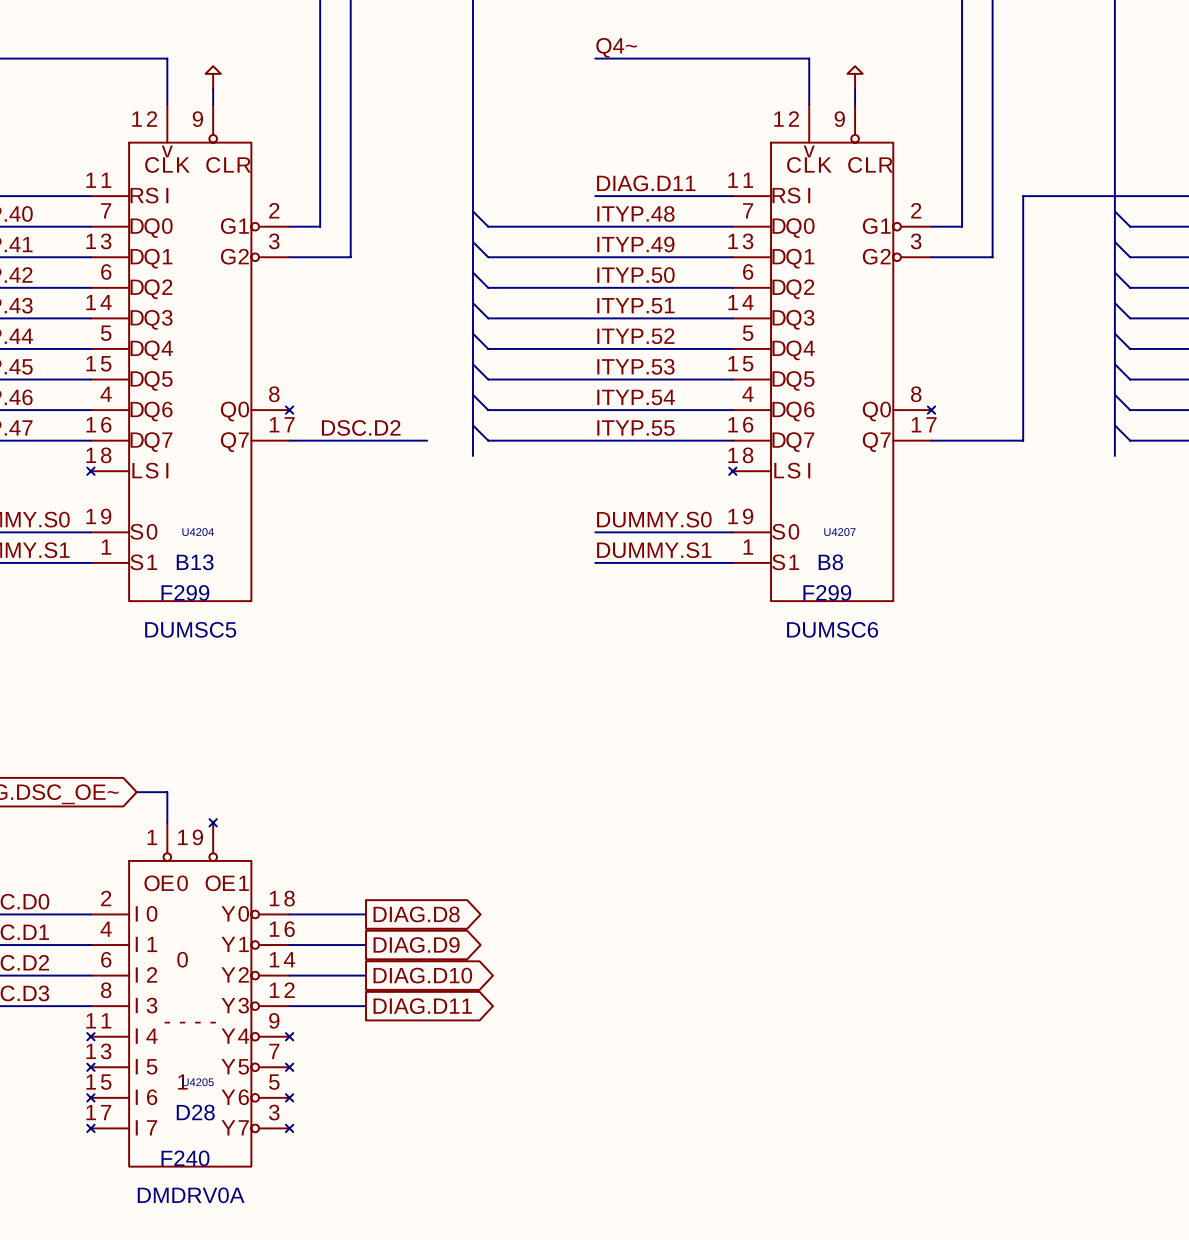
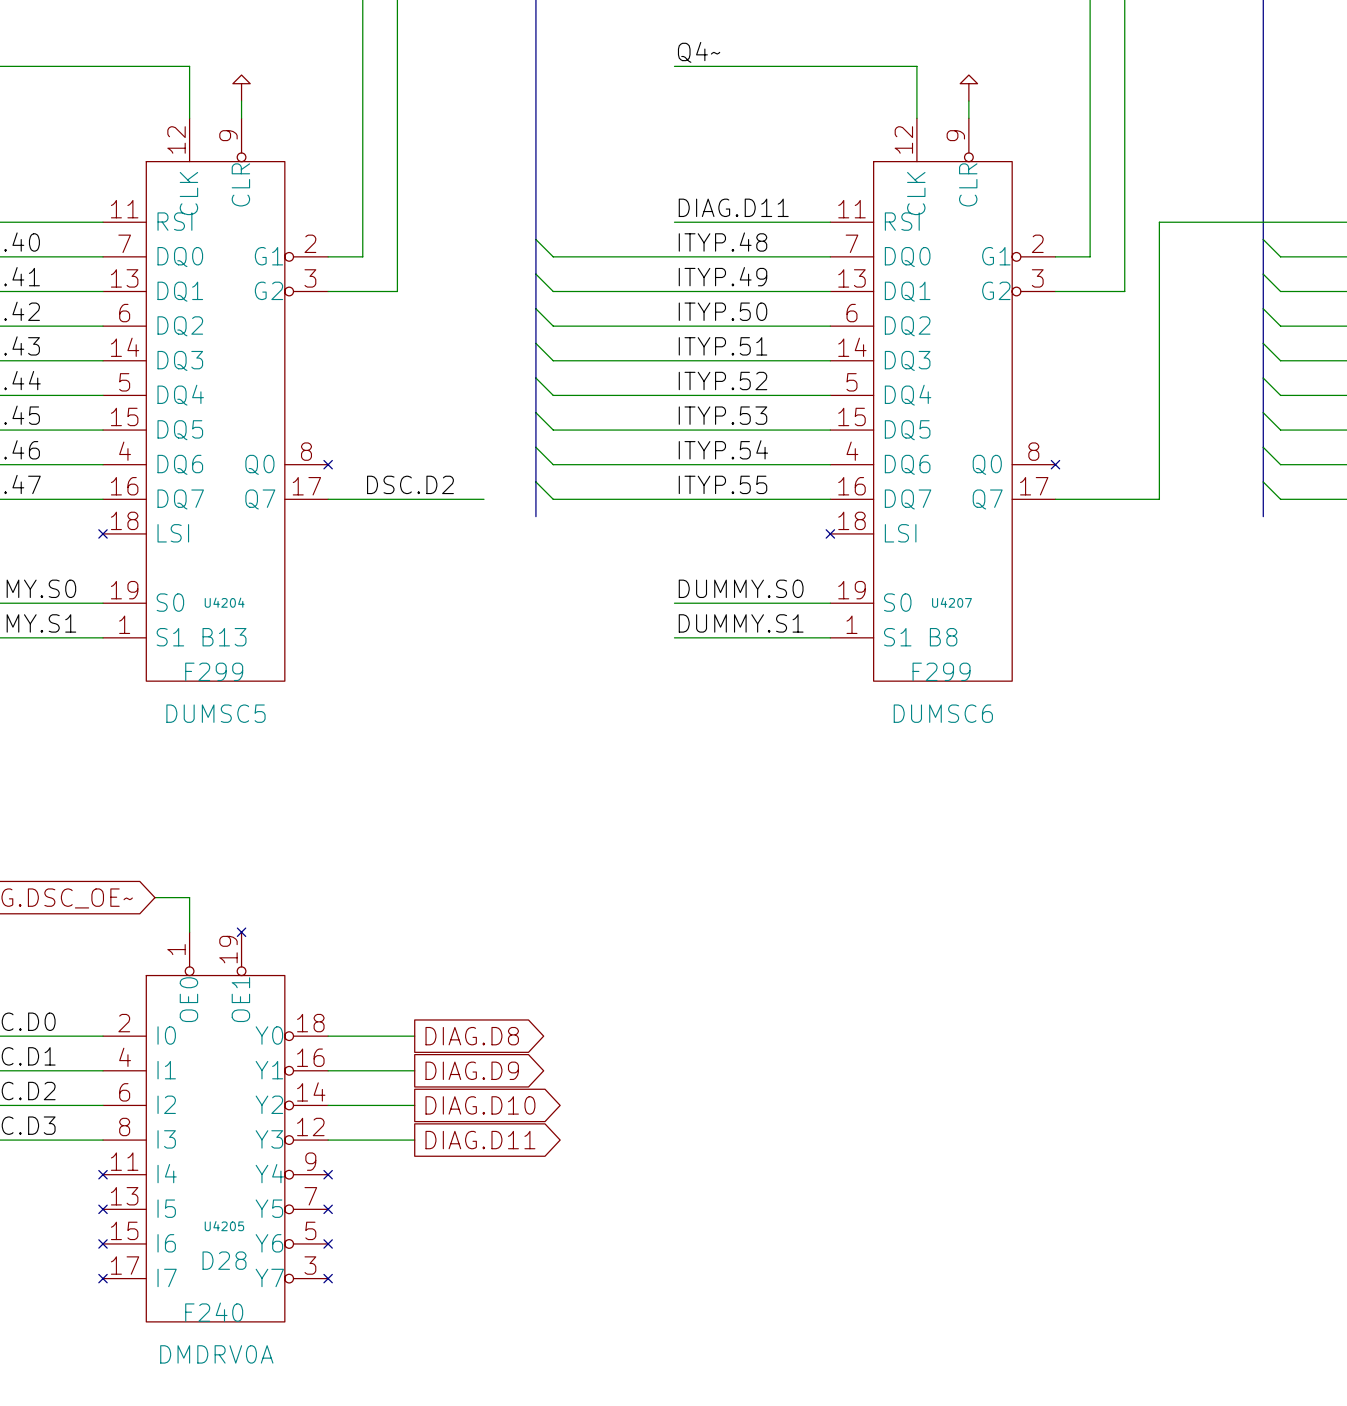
U4204 symbol: [90, 104, 290, 602] -> [103, 118, 329, 682]
U4207 symbol: [732, 104, 932, 602] -> [830, 118, 1056, 682]
U4205 symbol: [90, 822, 290, 1167] -> [103, 932, 329, 1322]

